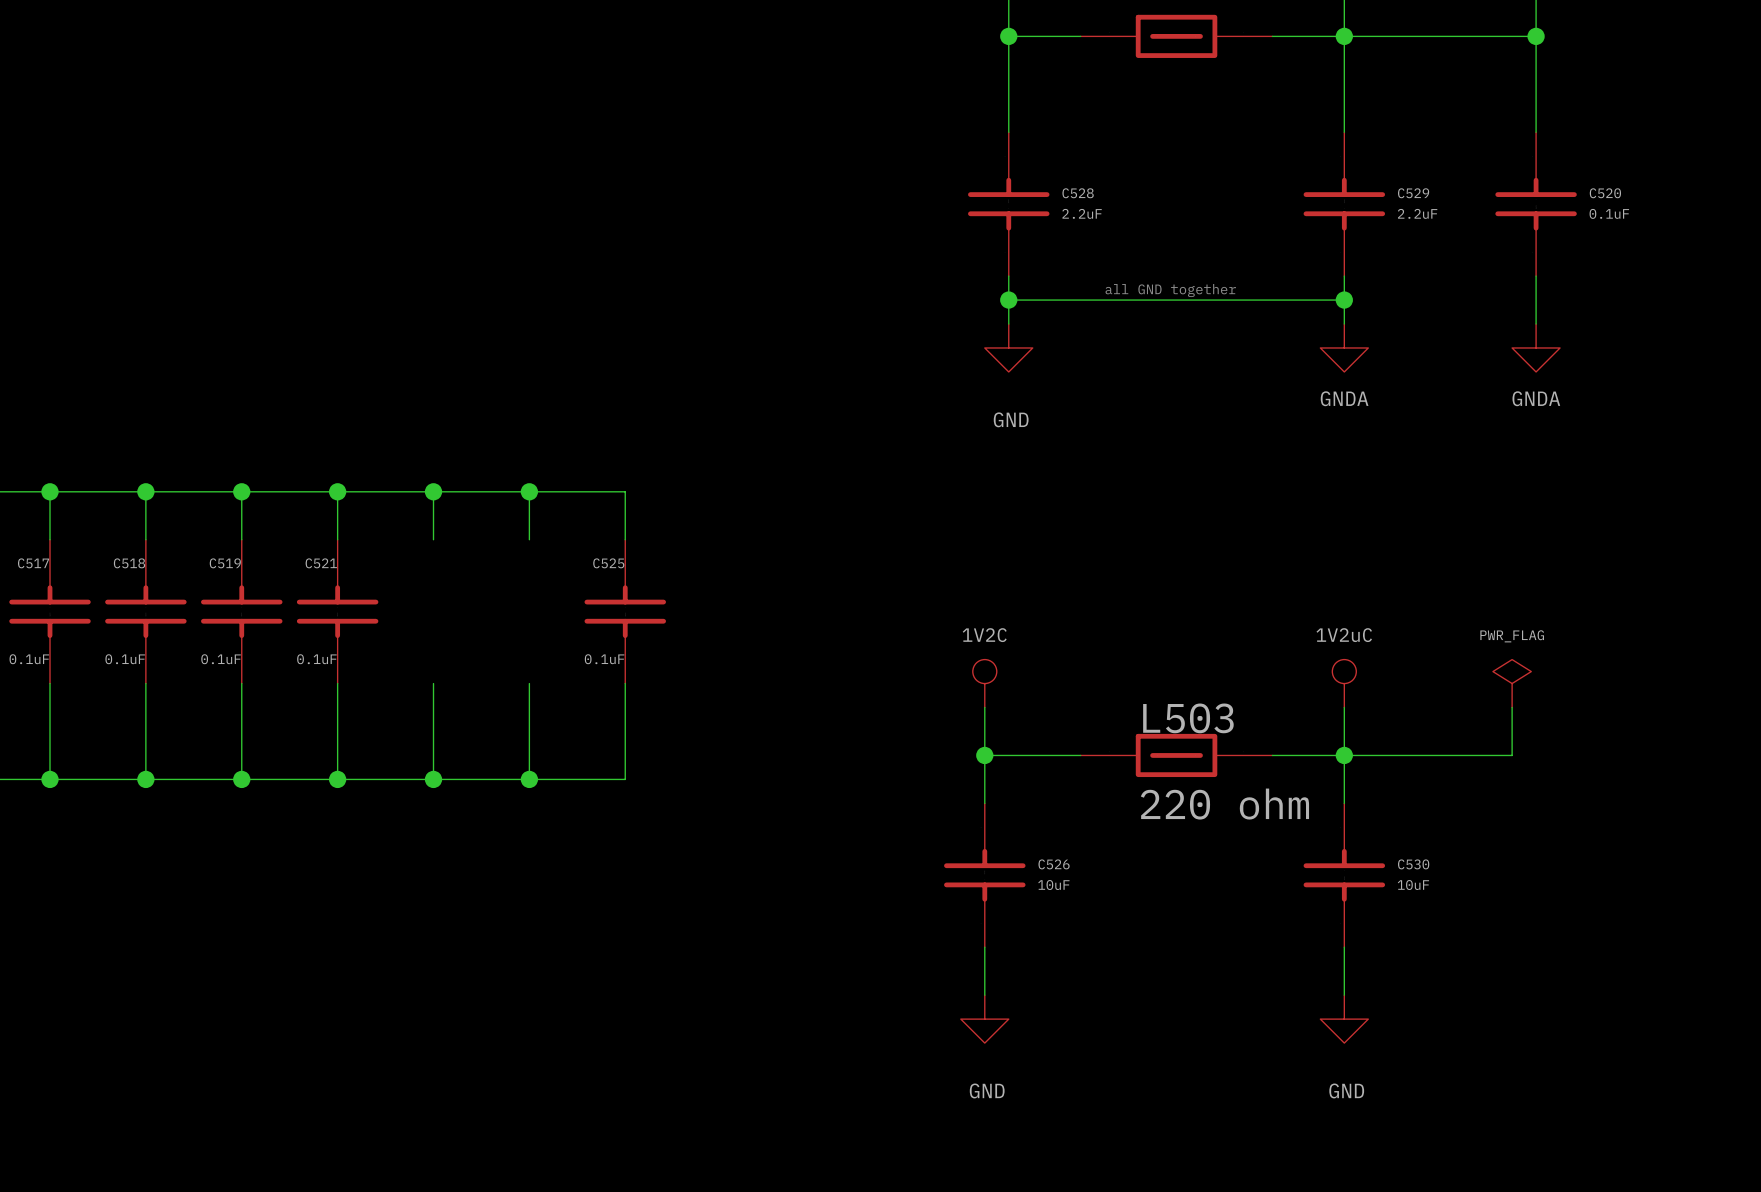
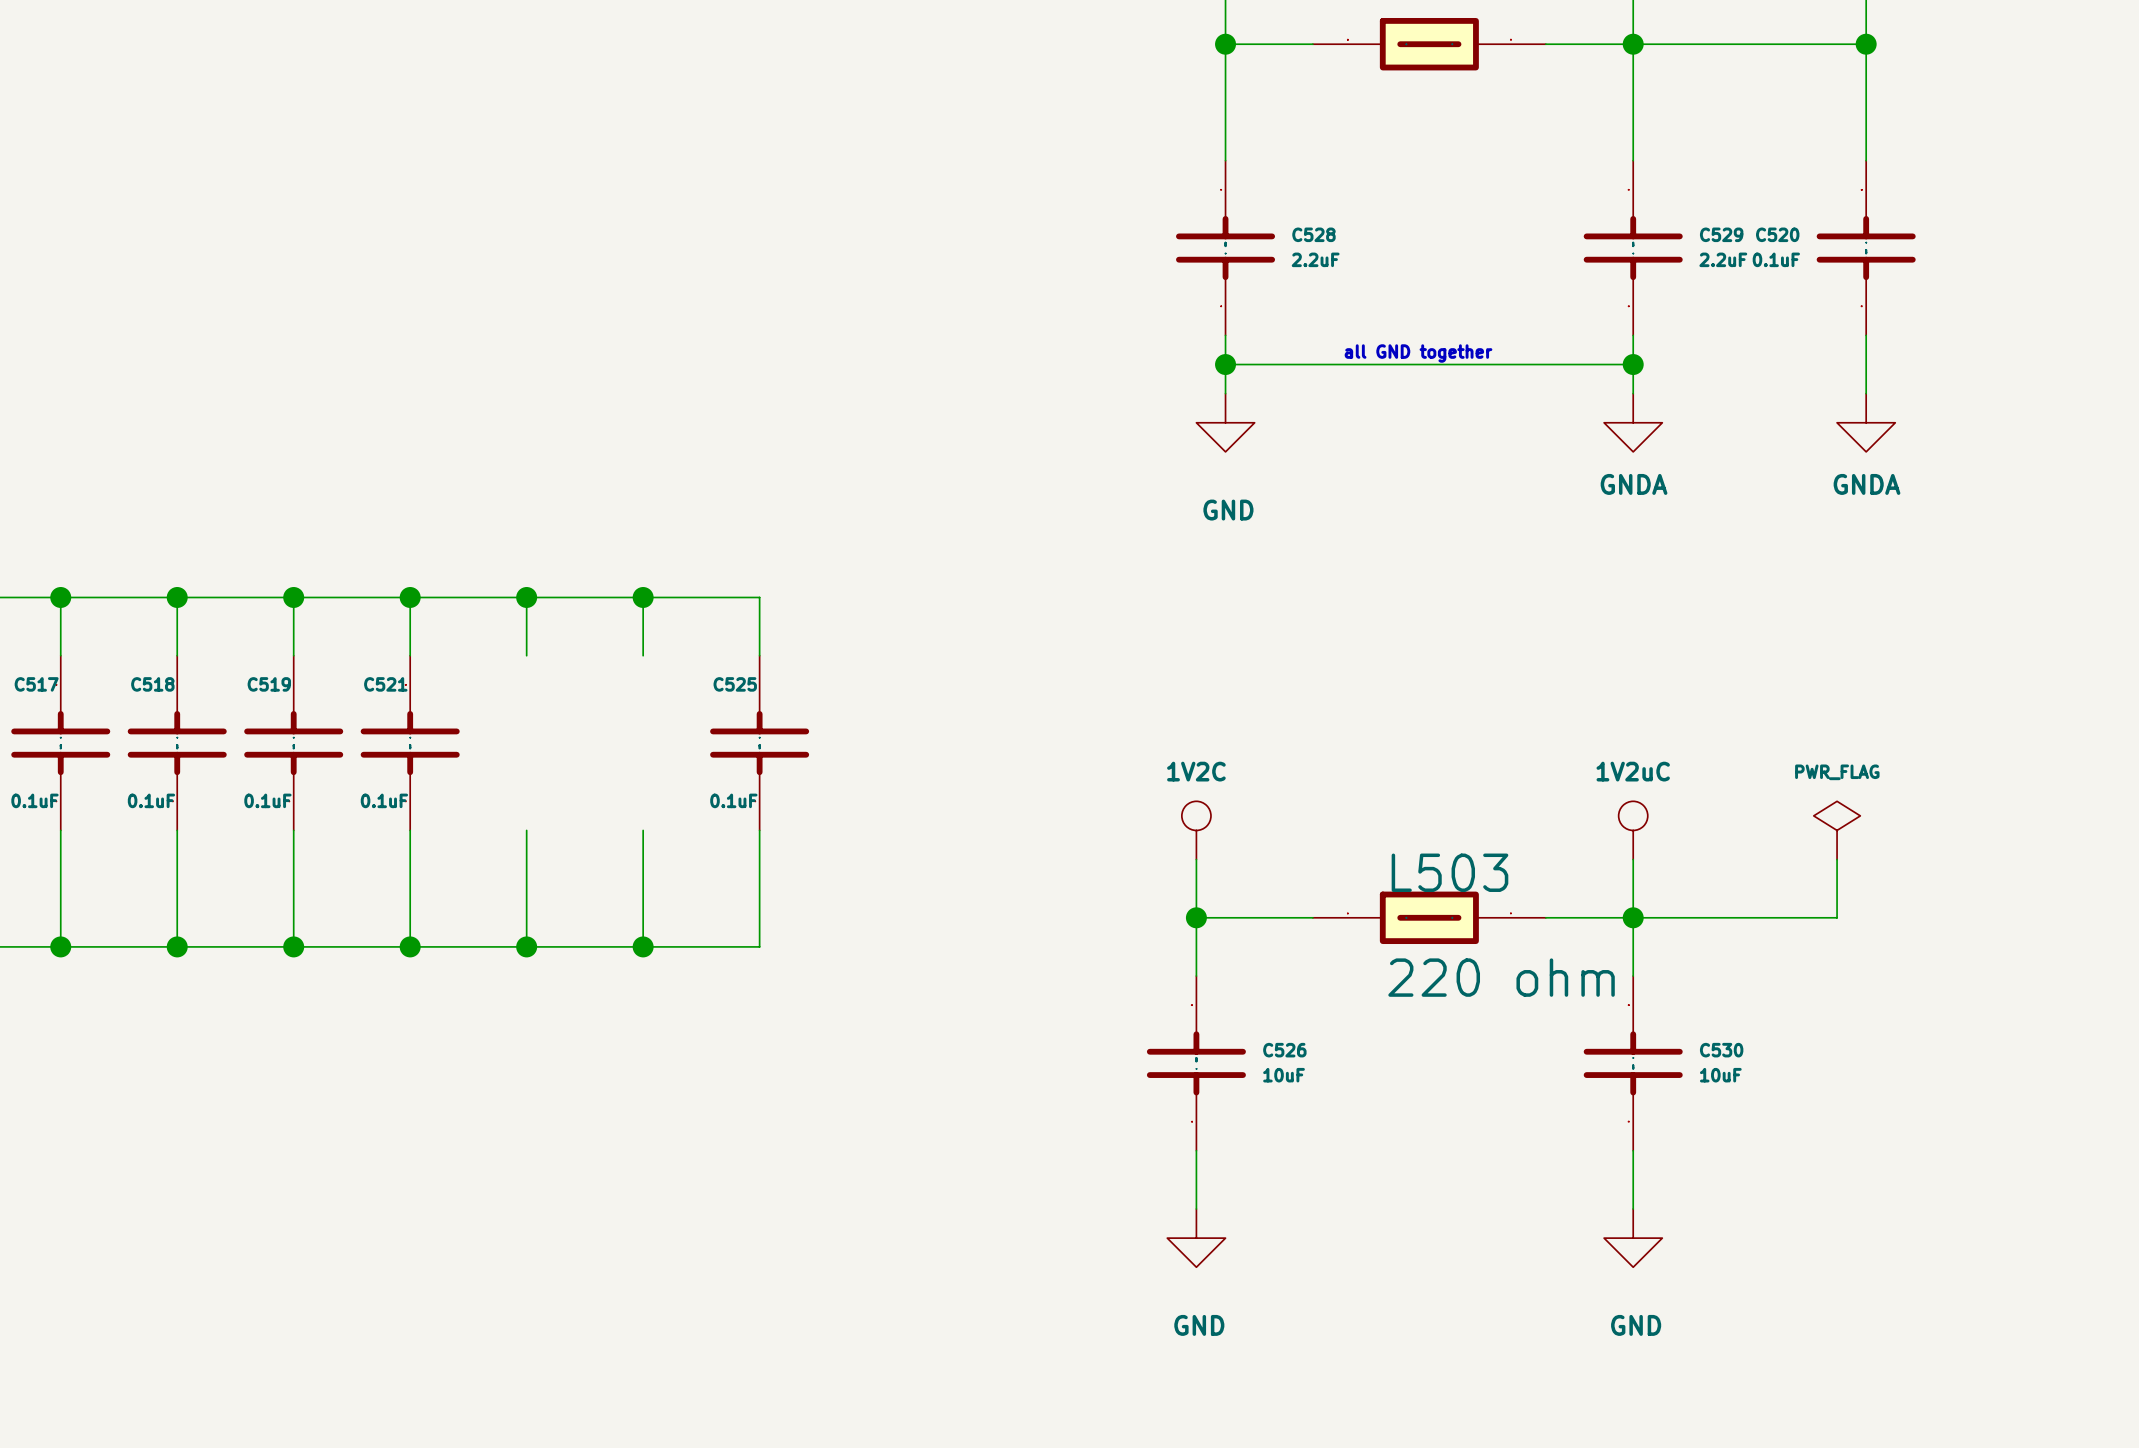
C520 name position: C520 (1605, 193) -> C520 (1777, 234)
C520 value position: 0.1uF (1609, 213) -> 0.1uF (1776, 259)

